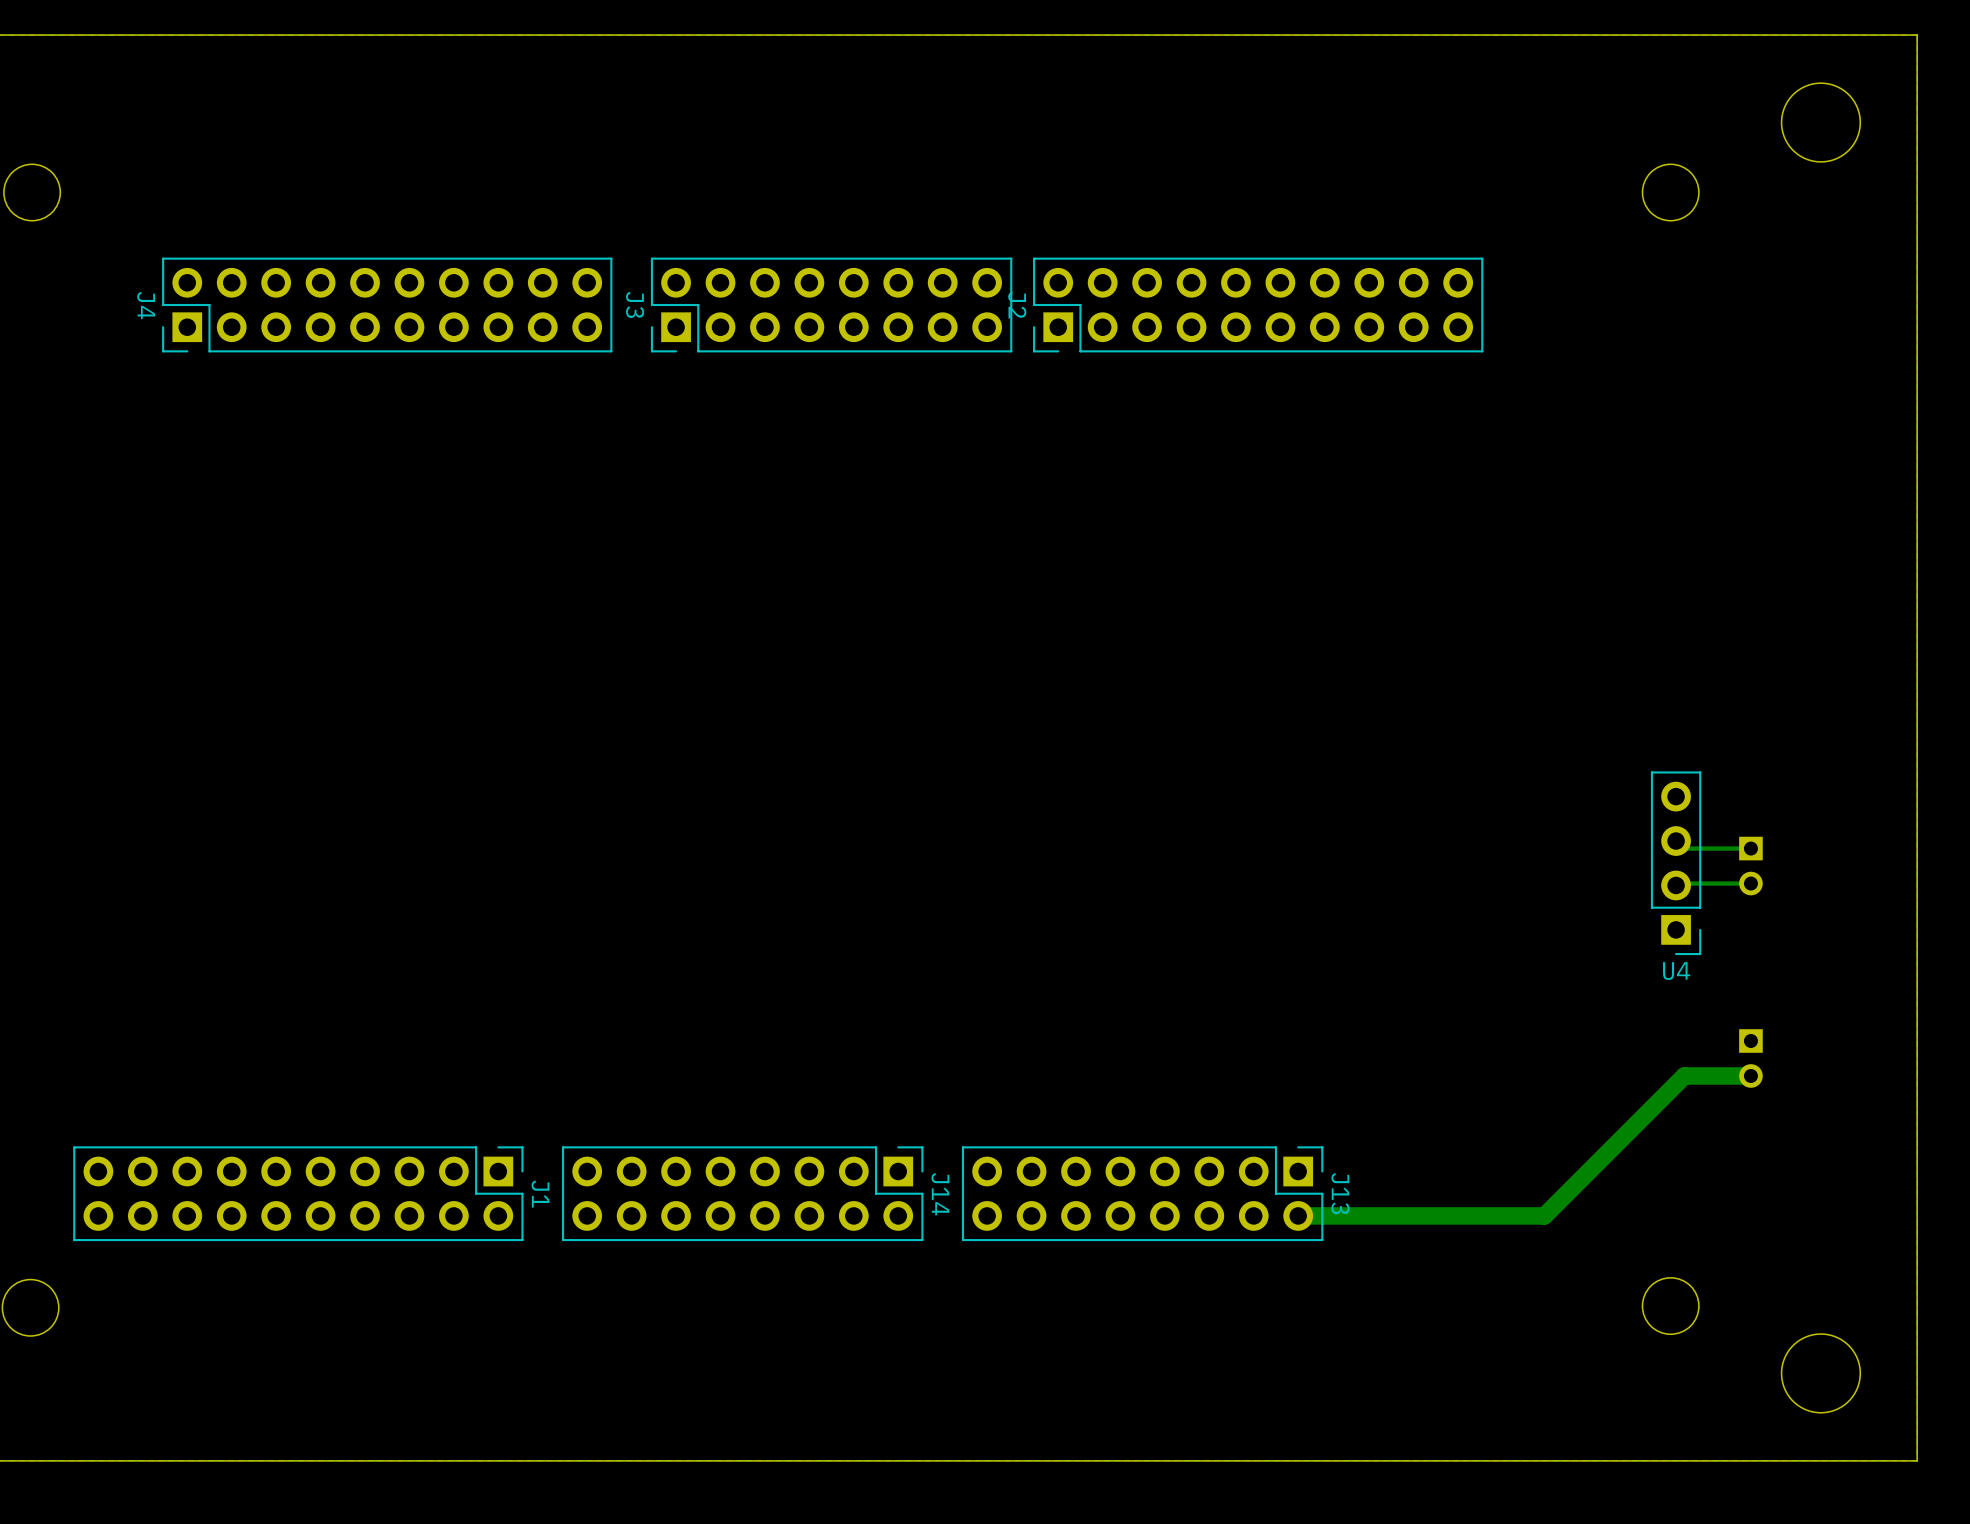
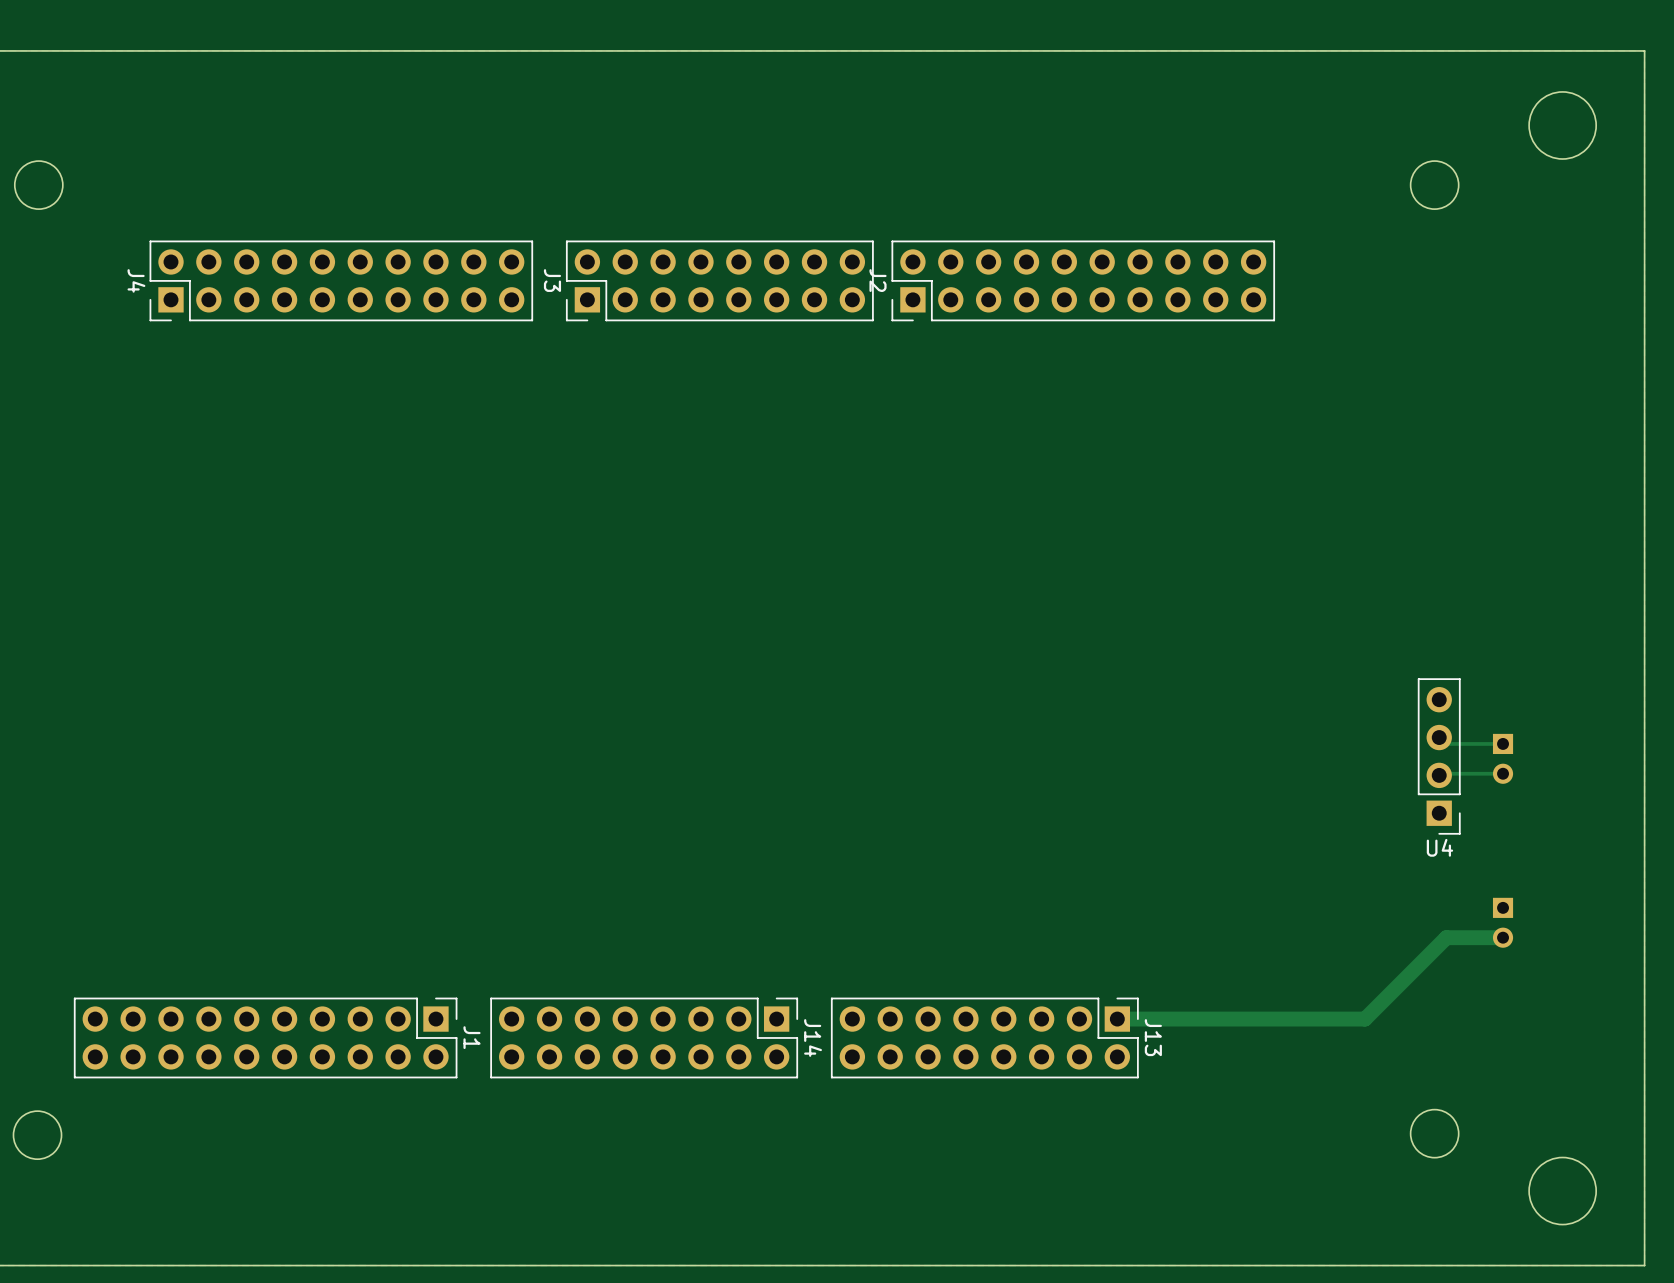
track: (1588, 1171) (1544, 1215) (1298, 1215) -> (1365, 1019) (1117, 1019)

